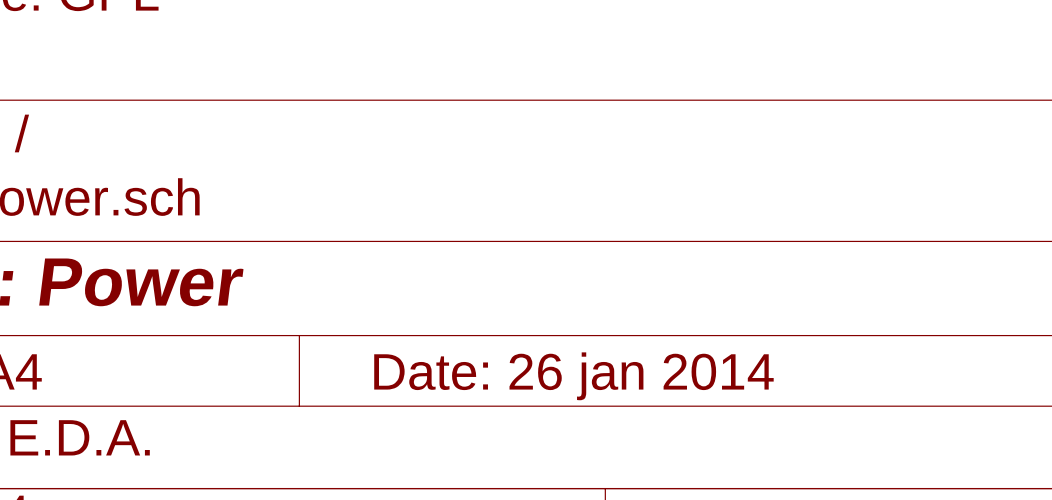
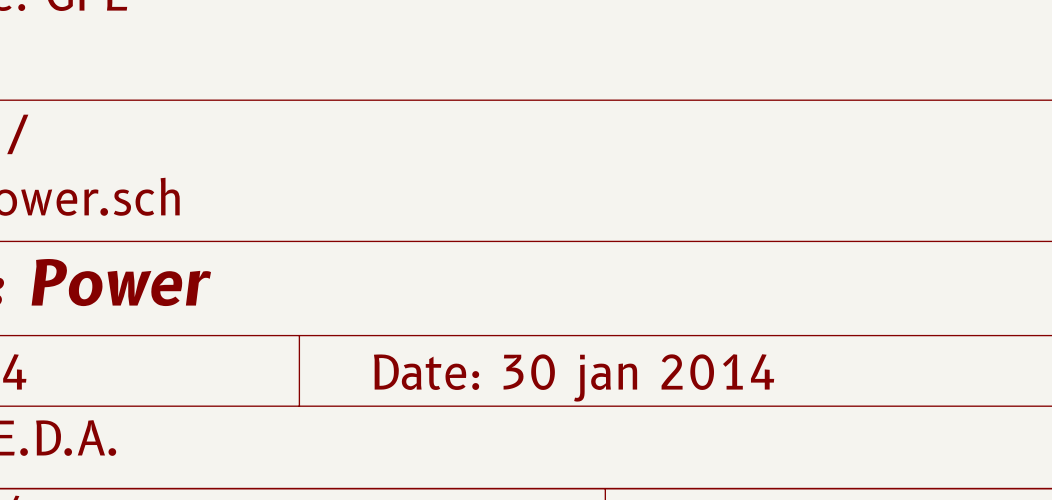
title block: Date: 26 jan 2014 (573, 376) -> Date: 30 jan 2014 (574, 377)

